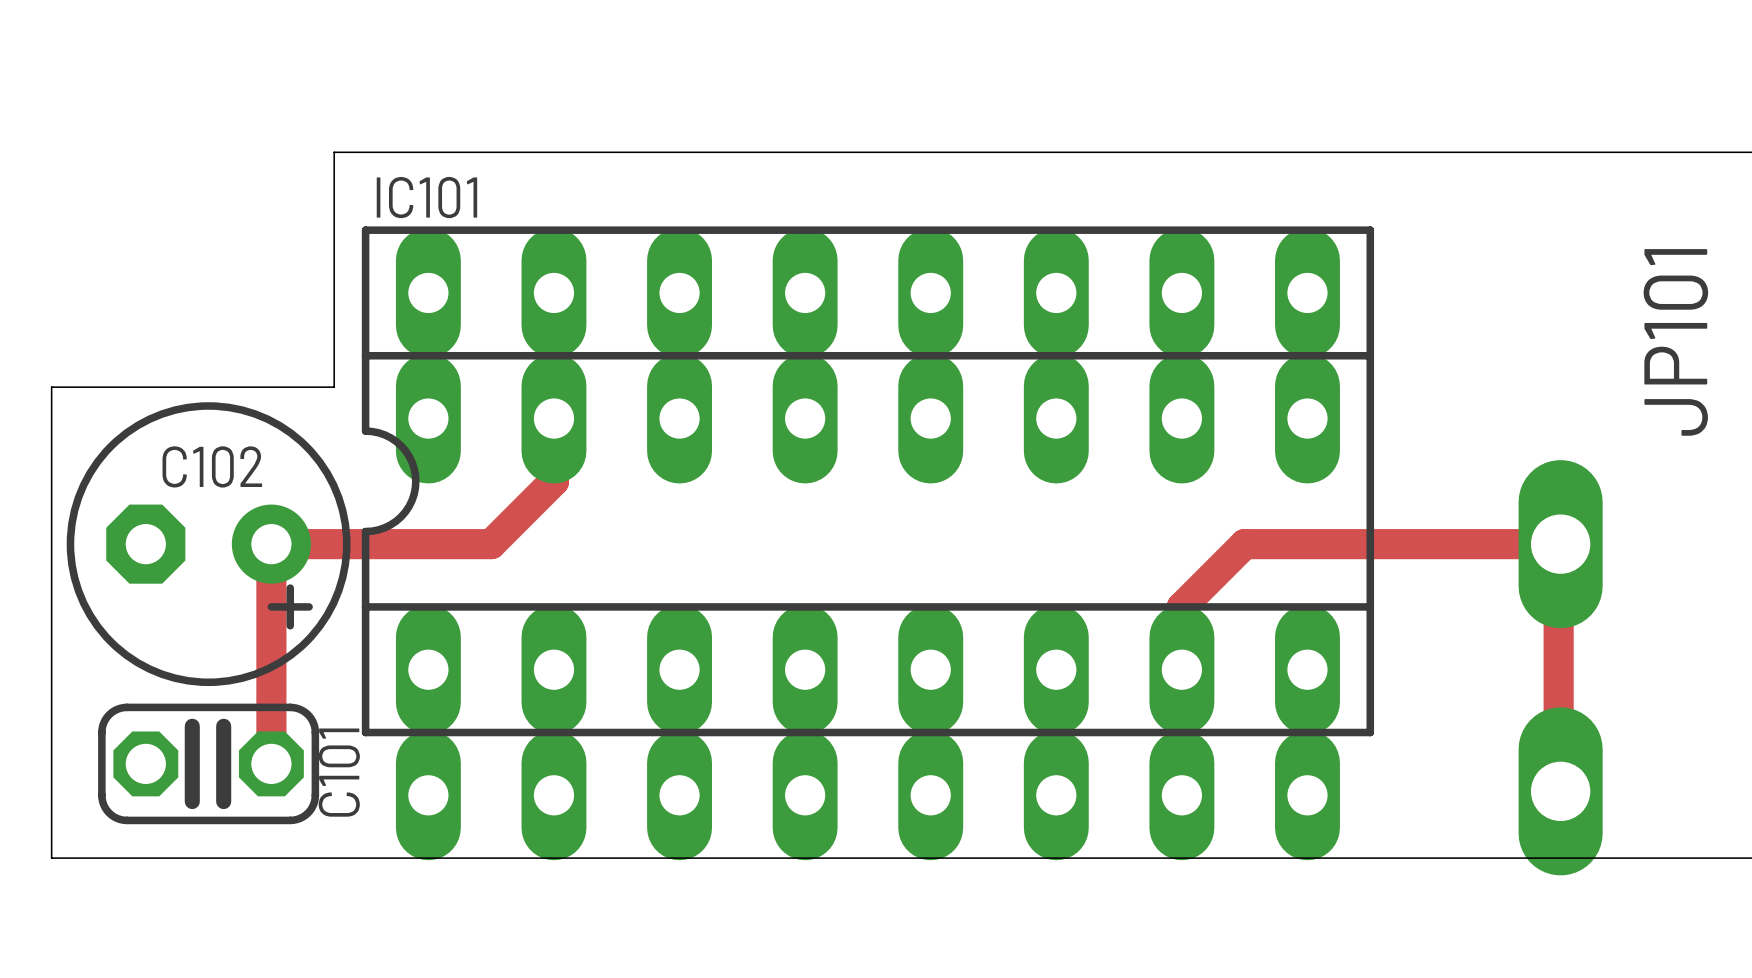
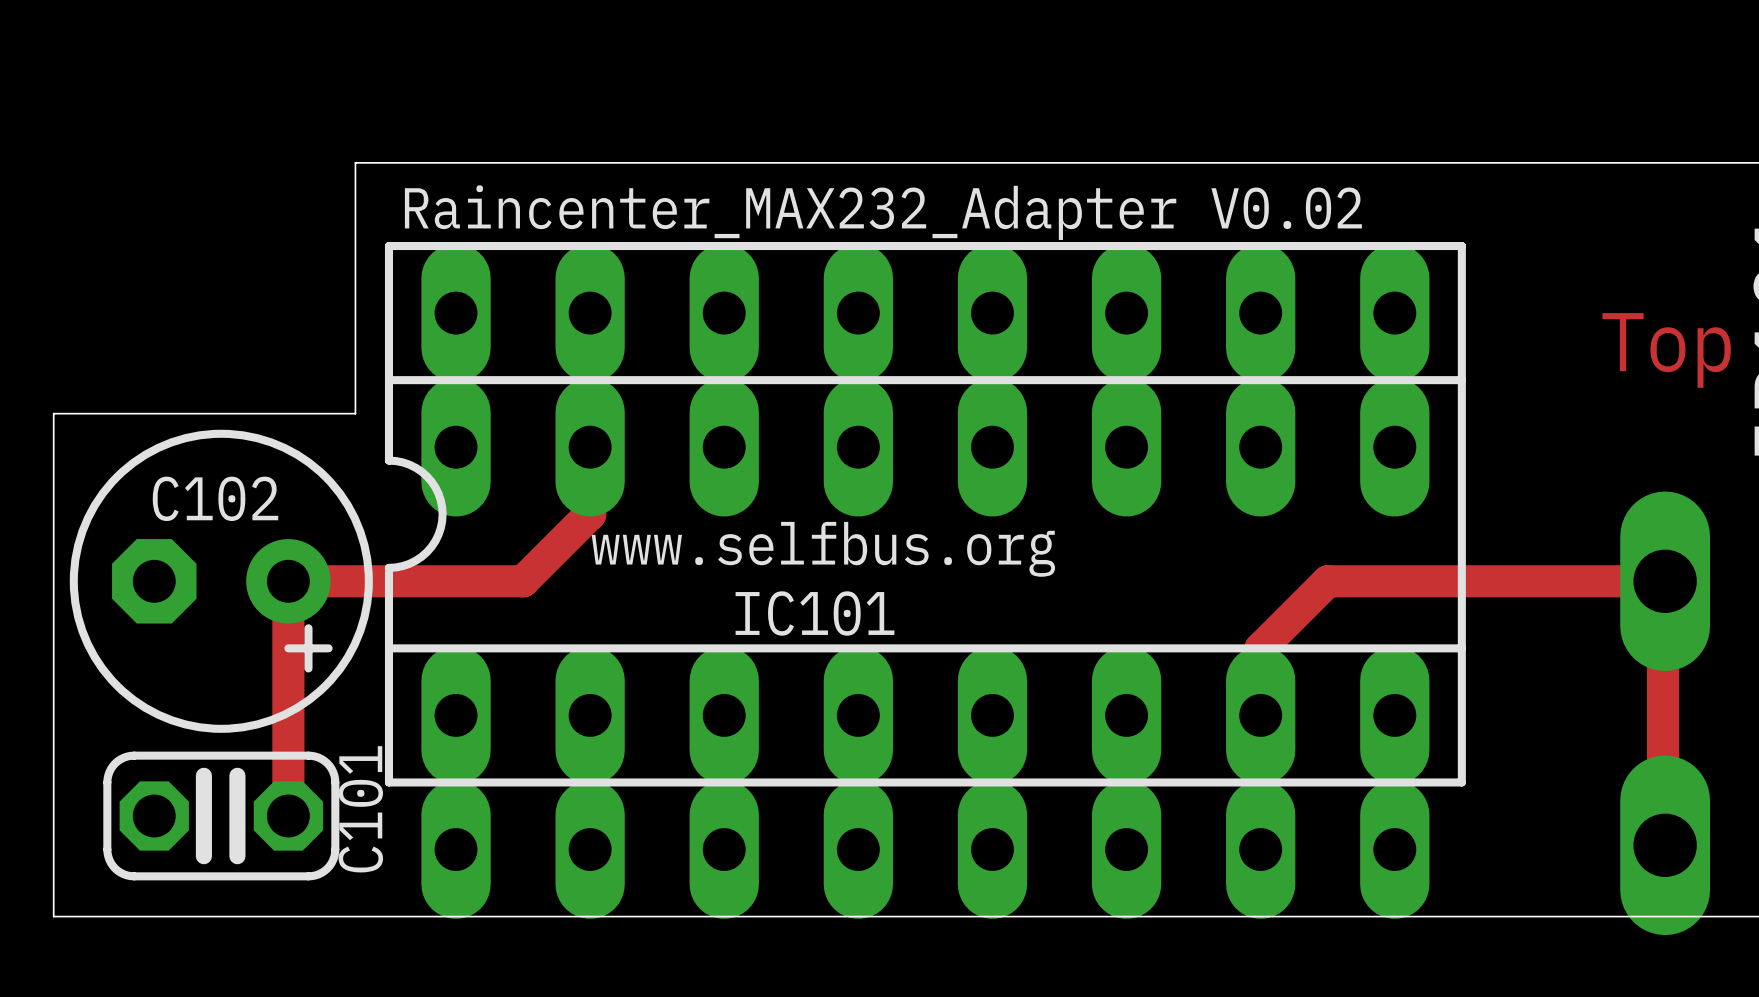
IC101 name position: IC101 (426, 197) -> IC101 (814, 613)
text: none -> Raincenter_MAX232_Adapter V0.02 (883, 212)
text: none -> Top (1666, 350)
text: none -> www.selfbus.org (823, 549)

